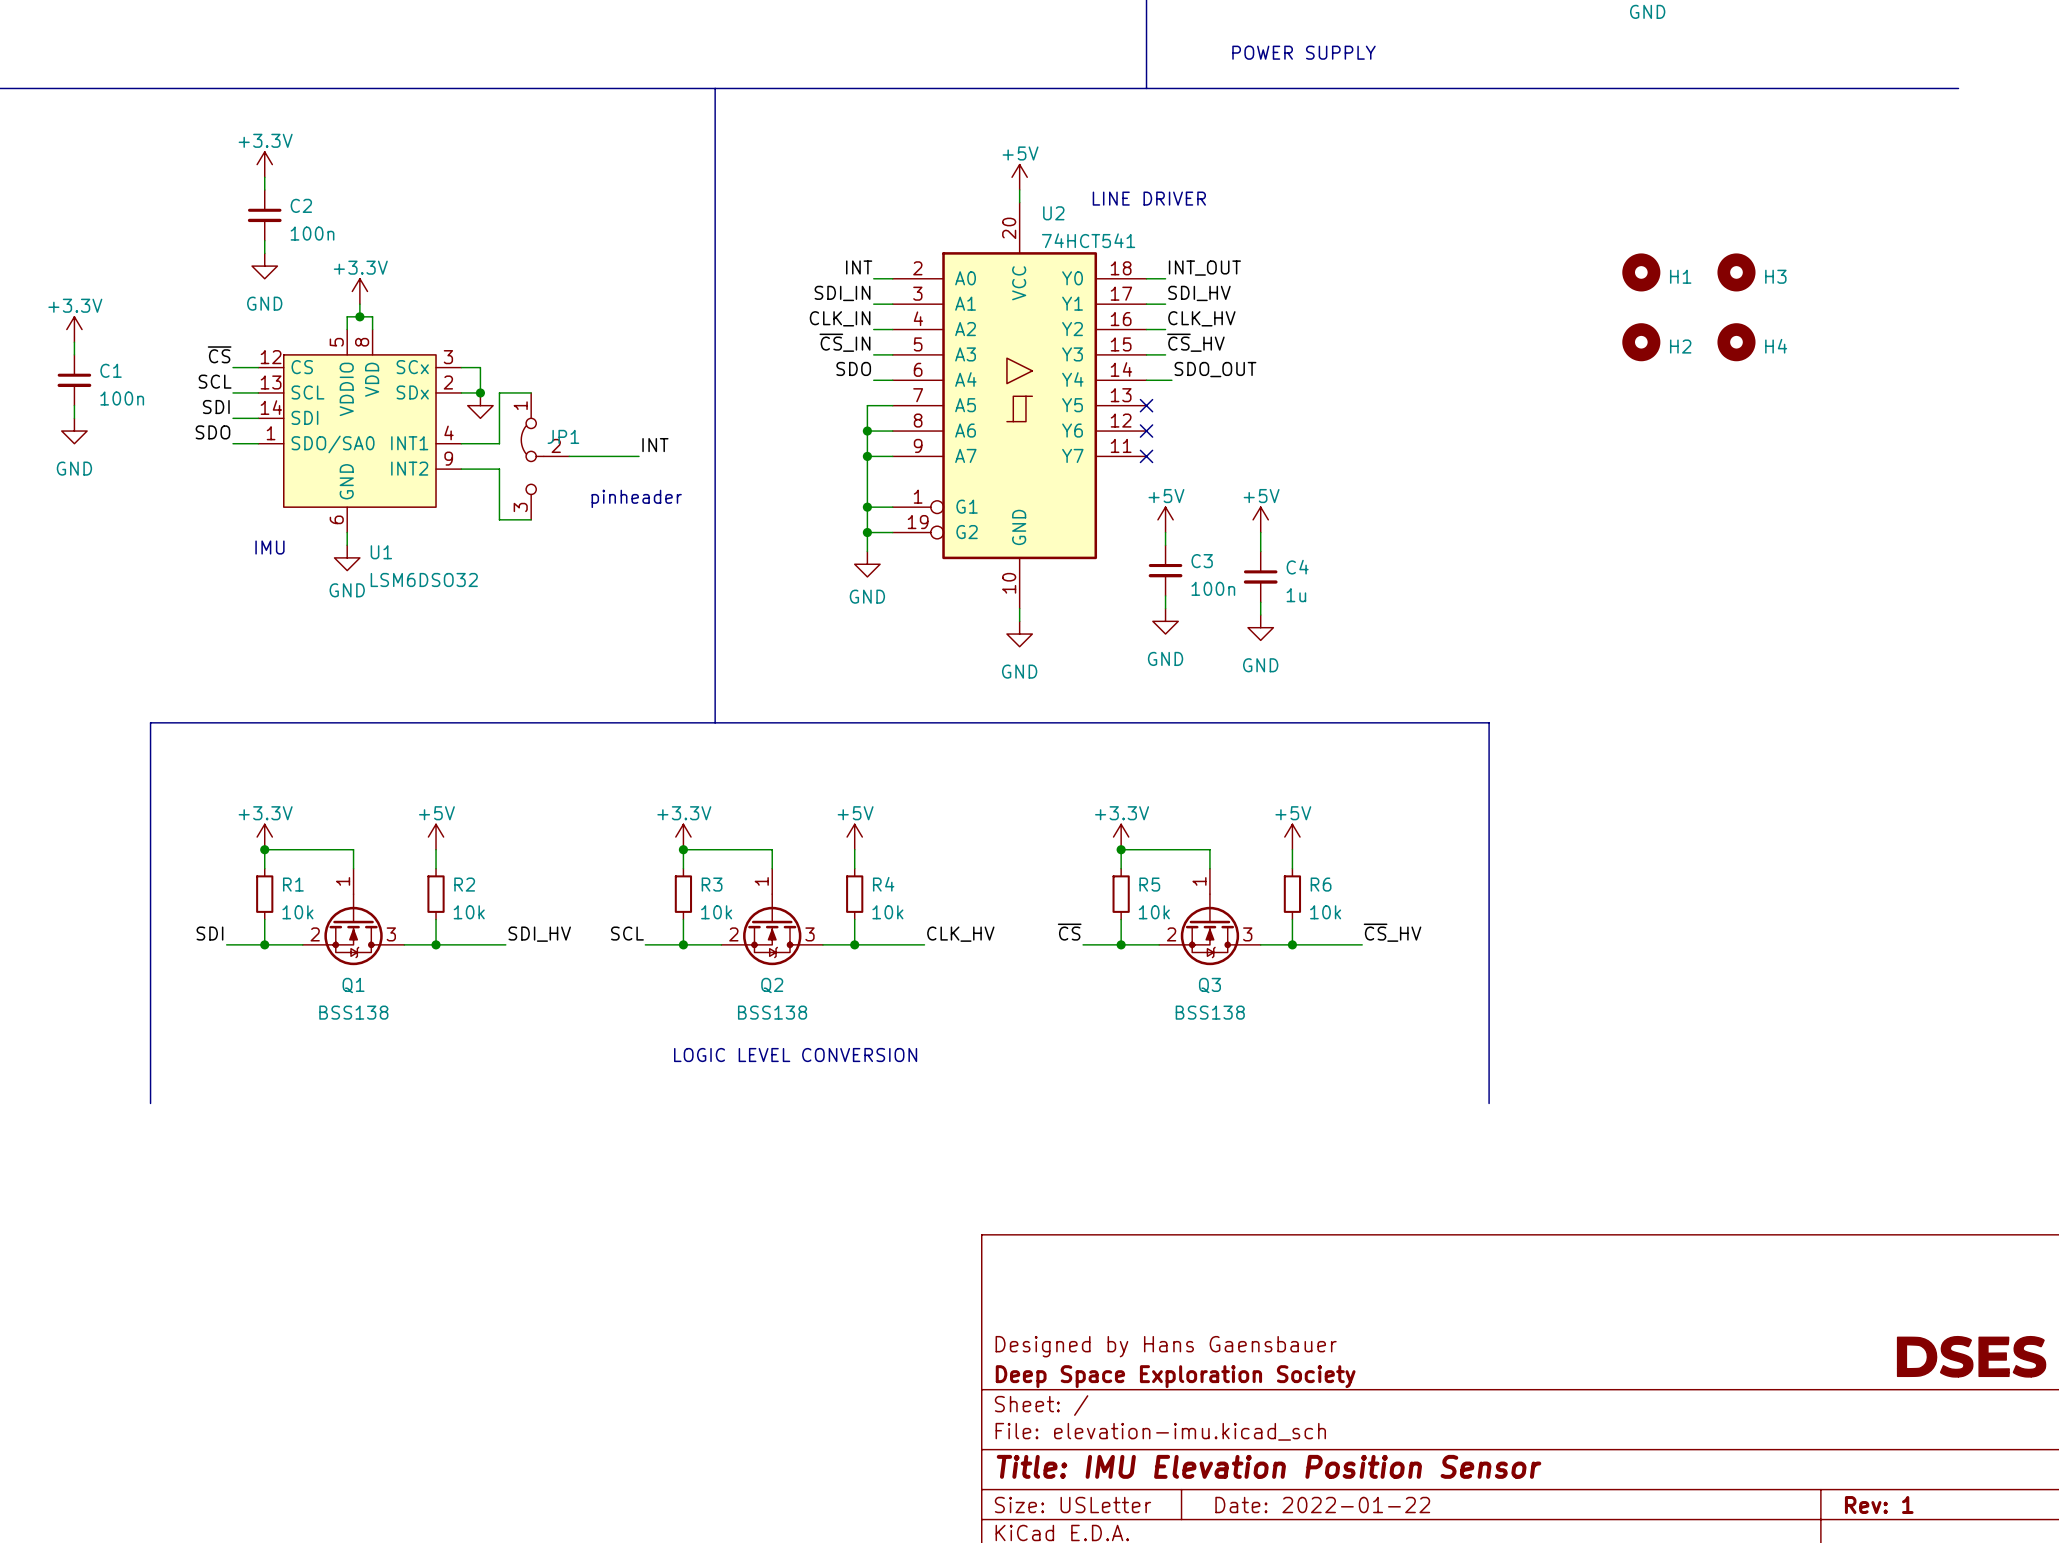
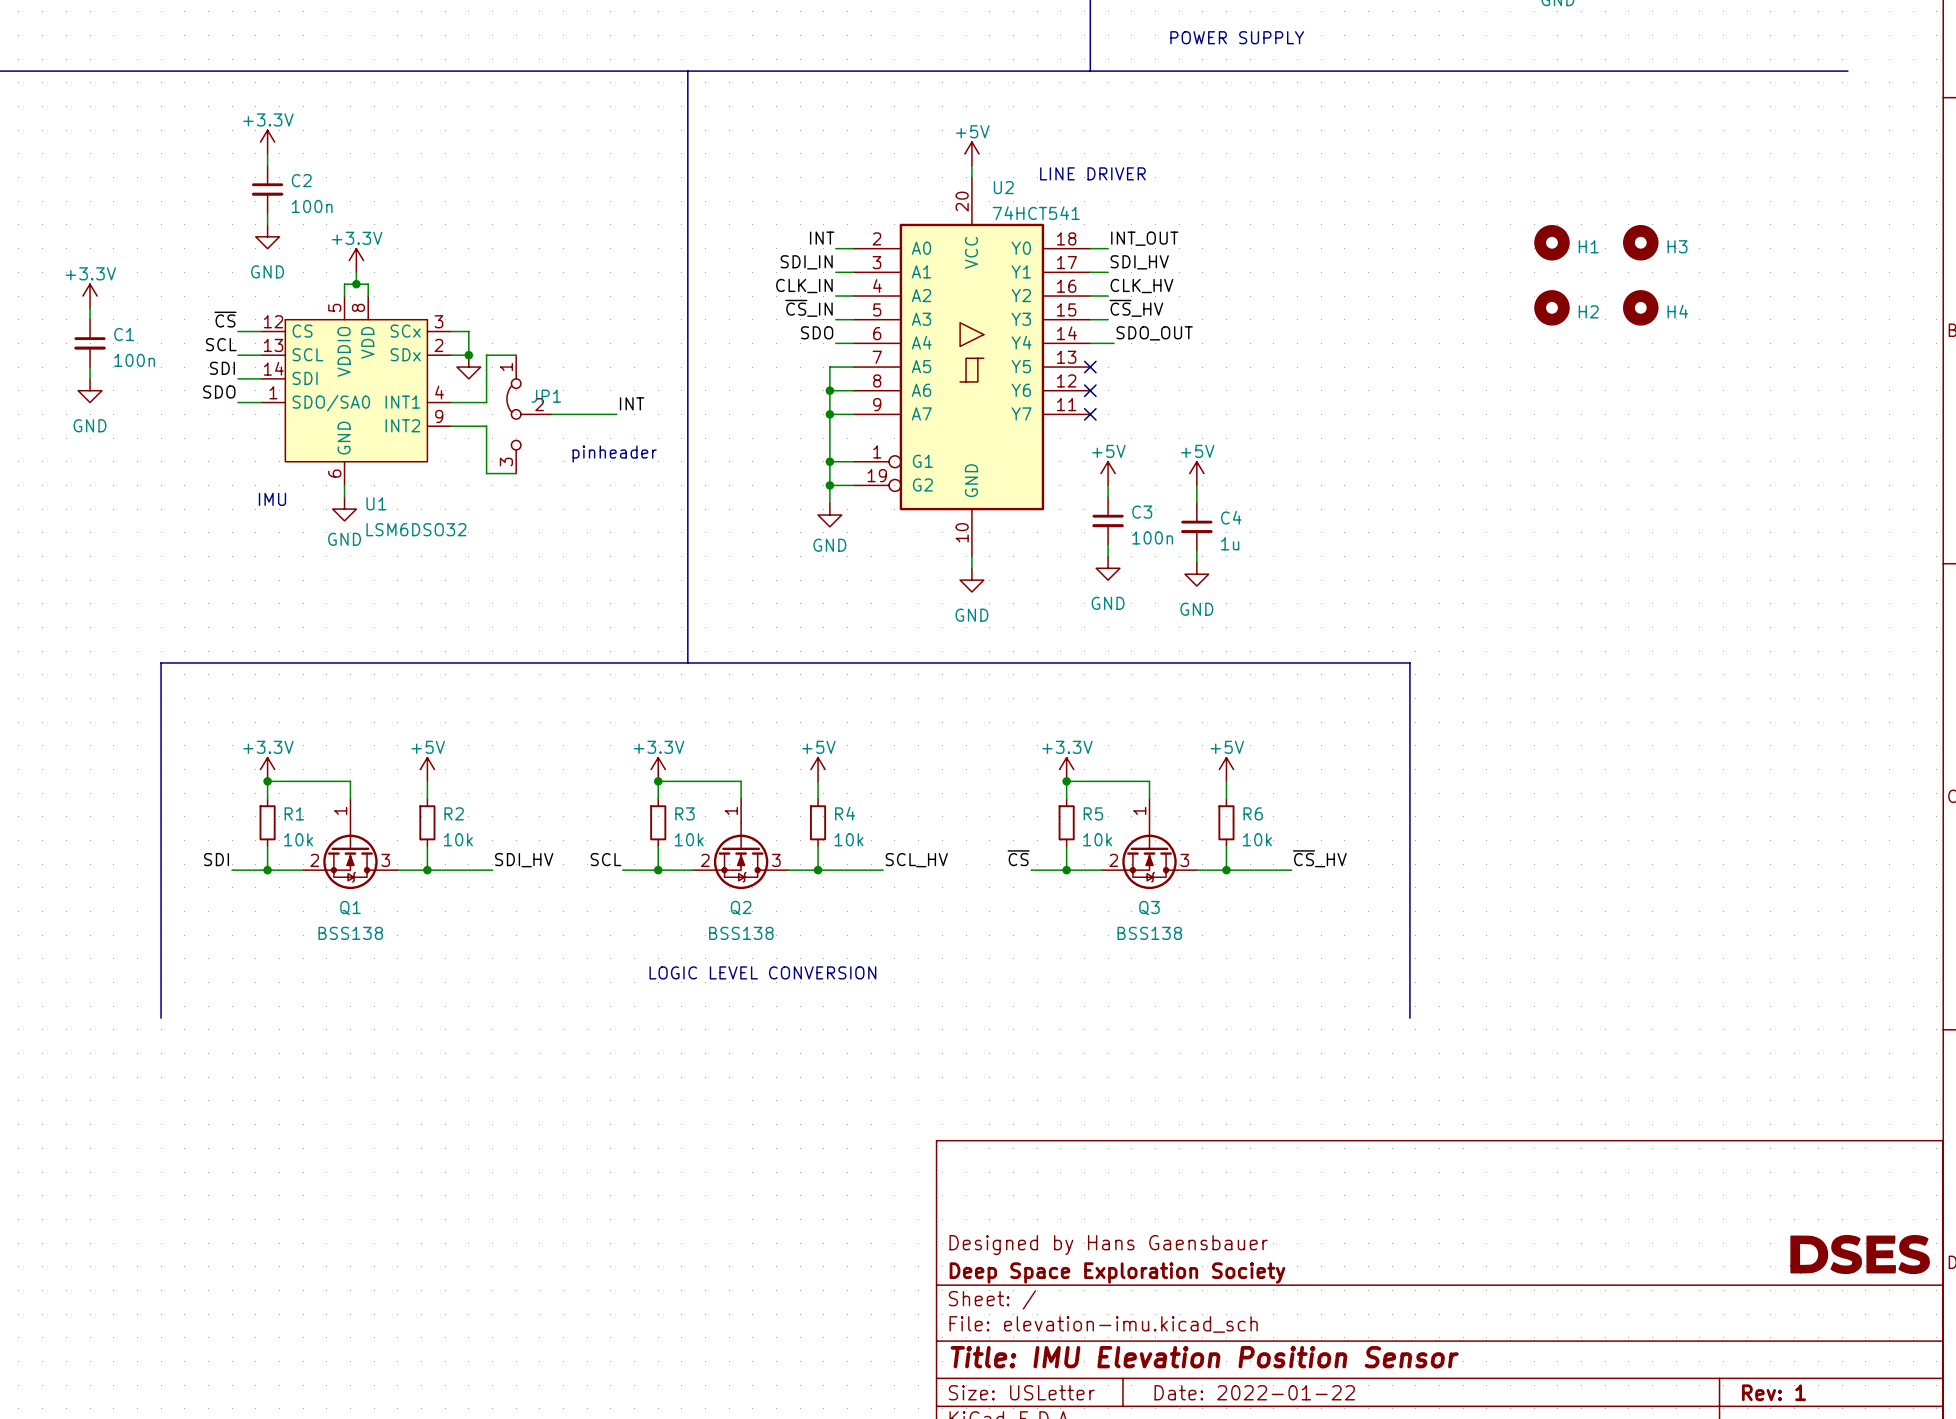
label: CLK_HV (960, 934) -> SCL_HV (916, 860)

